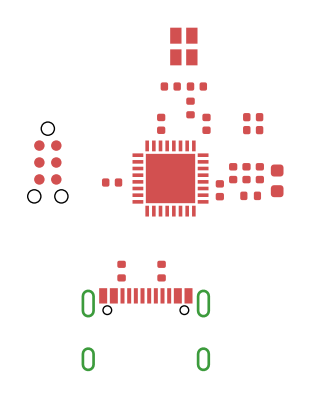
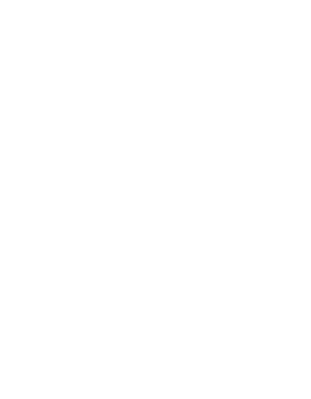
part: (183, 46) -> none
part: (170, 86) -> none
part: (196, 86) -> none
part: (190, 107) -> none
part: (253, 117) -> none
part: (161, 123) -> none
part: (206, 123) -> none
part: (253, 130) -> none
part: (47, 162) -> none
part: (233, 173) -> none
part: (246, 173) -> none
part: (259, 173) -> none
part: (170, 178) -> none
part: (277, 180) -> none
part: (112, 182) -> none
part: (219, 190) -> none
part: (250, 195) -> none
part: (121, 271) -> none
part: (161, 271) -> none
part: (145, 329) -> none

